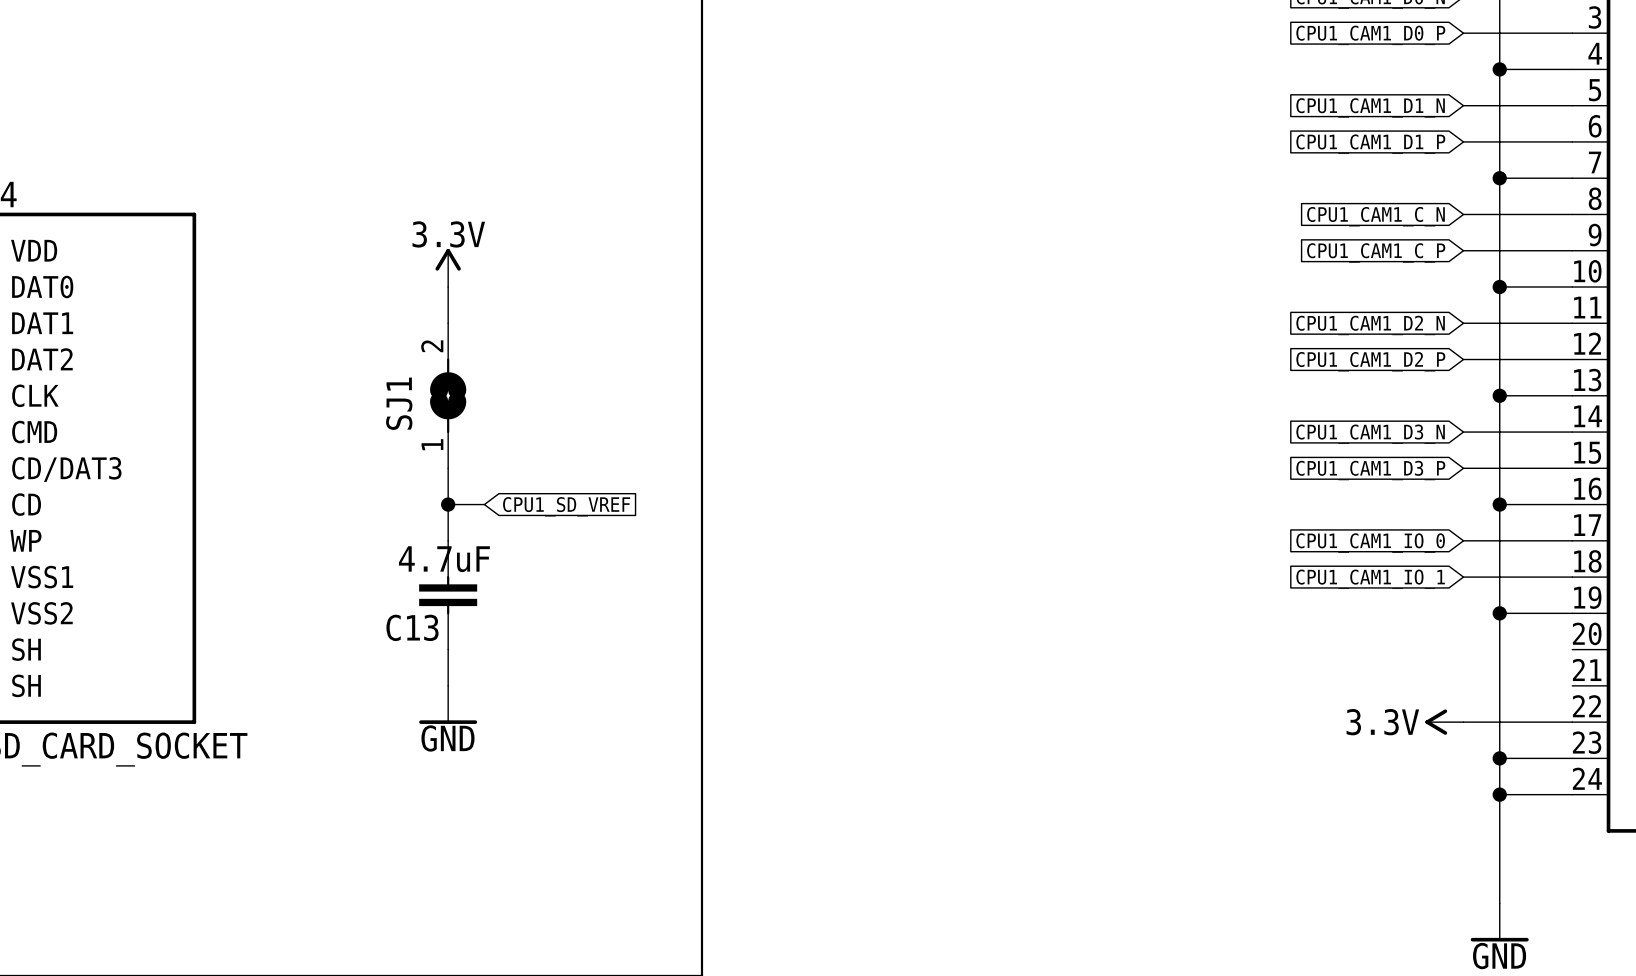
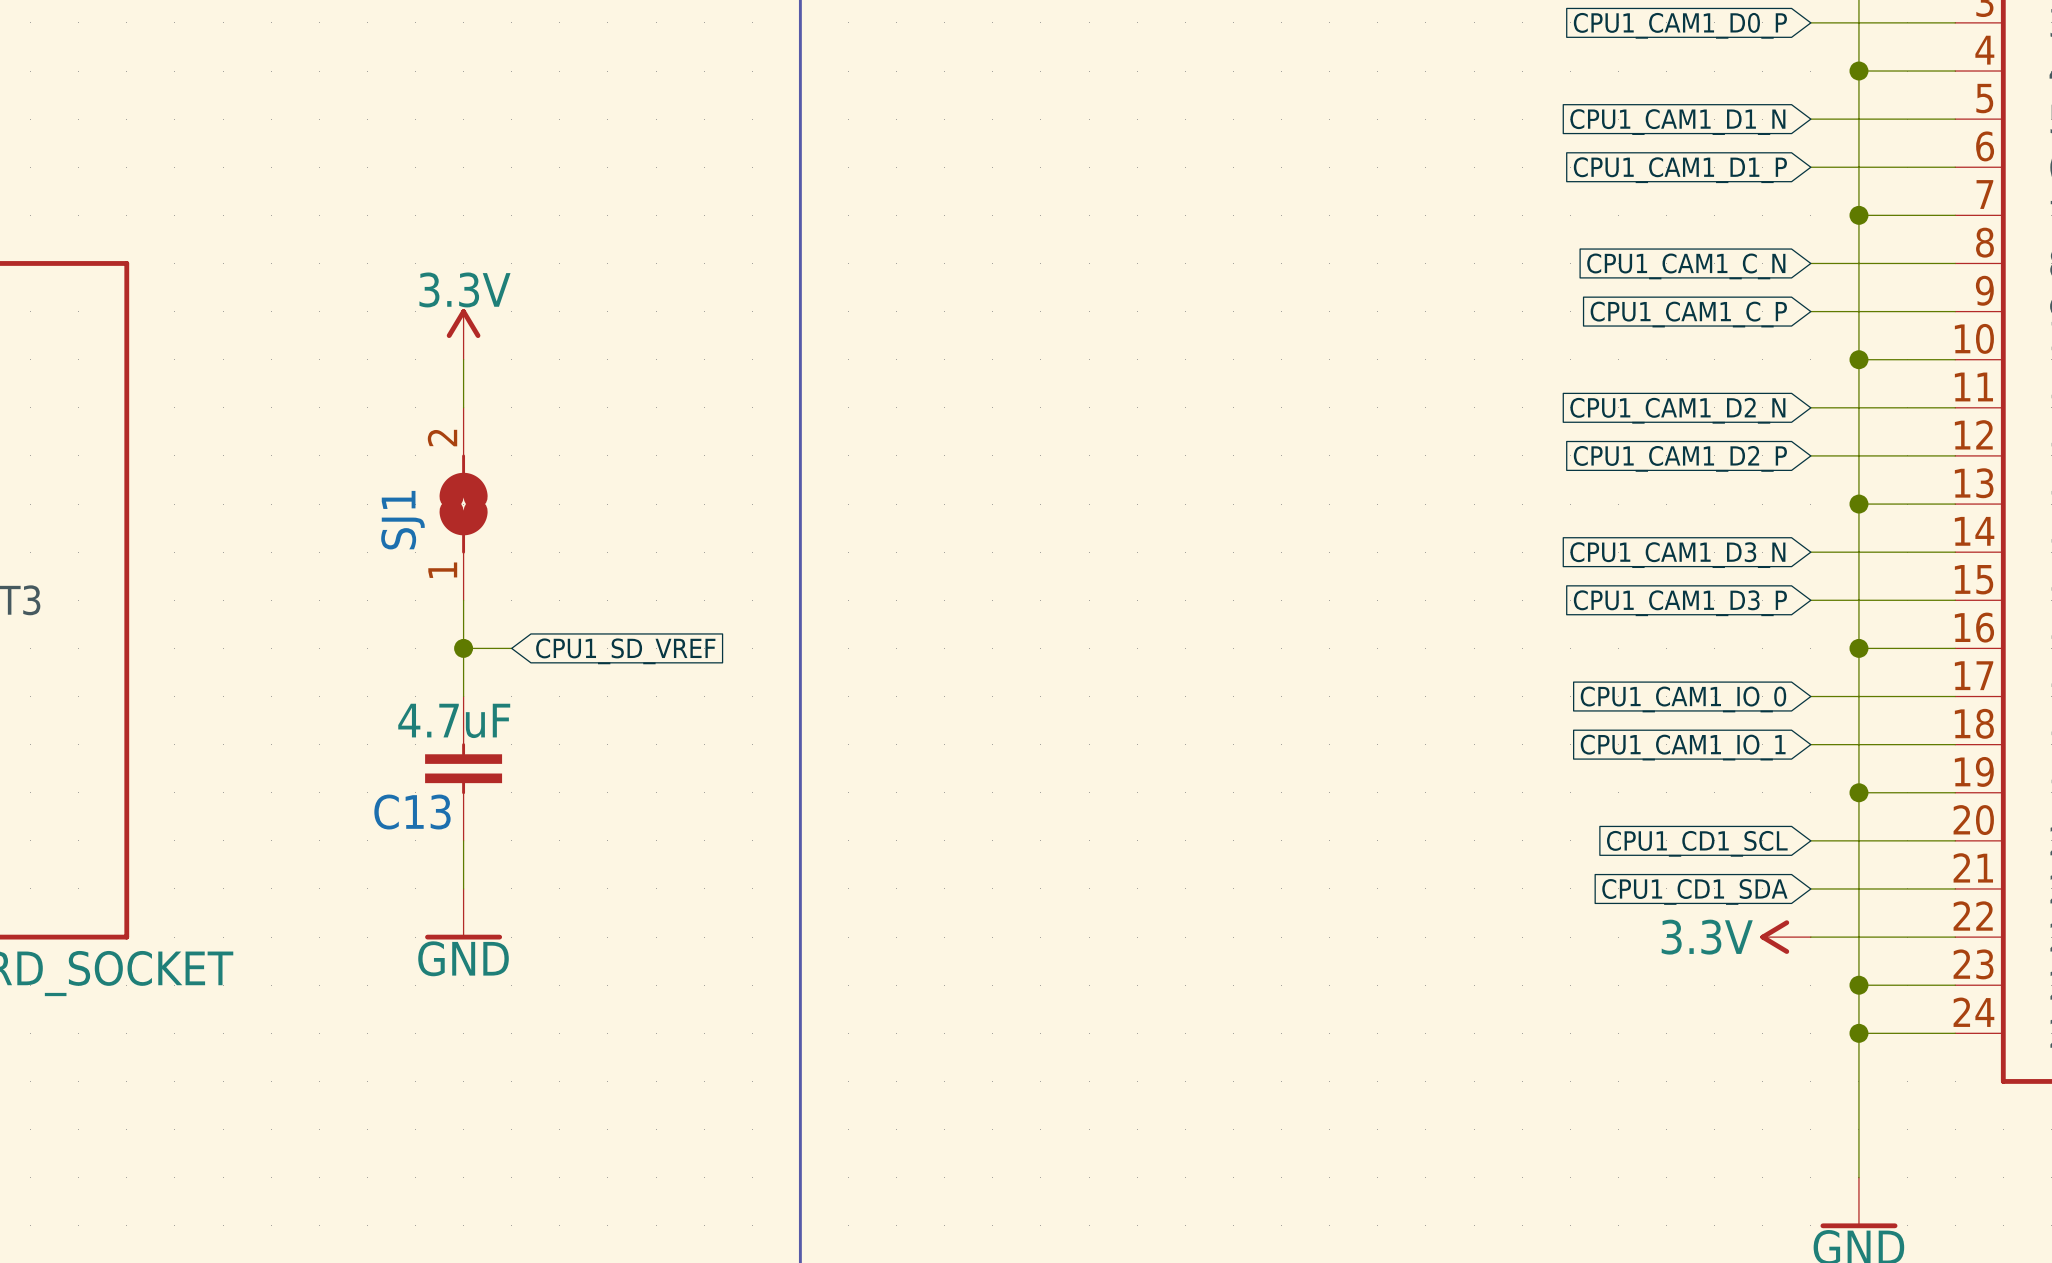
wire: none -> (1810, 840) (1955, 840)
global label: none -> CPU1_CD1_SCL (1697, 843)
wire: none -> (1810, 888) (1955, 888)
global label: none -> CPU1_CD1_SDA (1694, 891)

